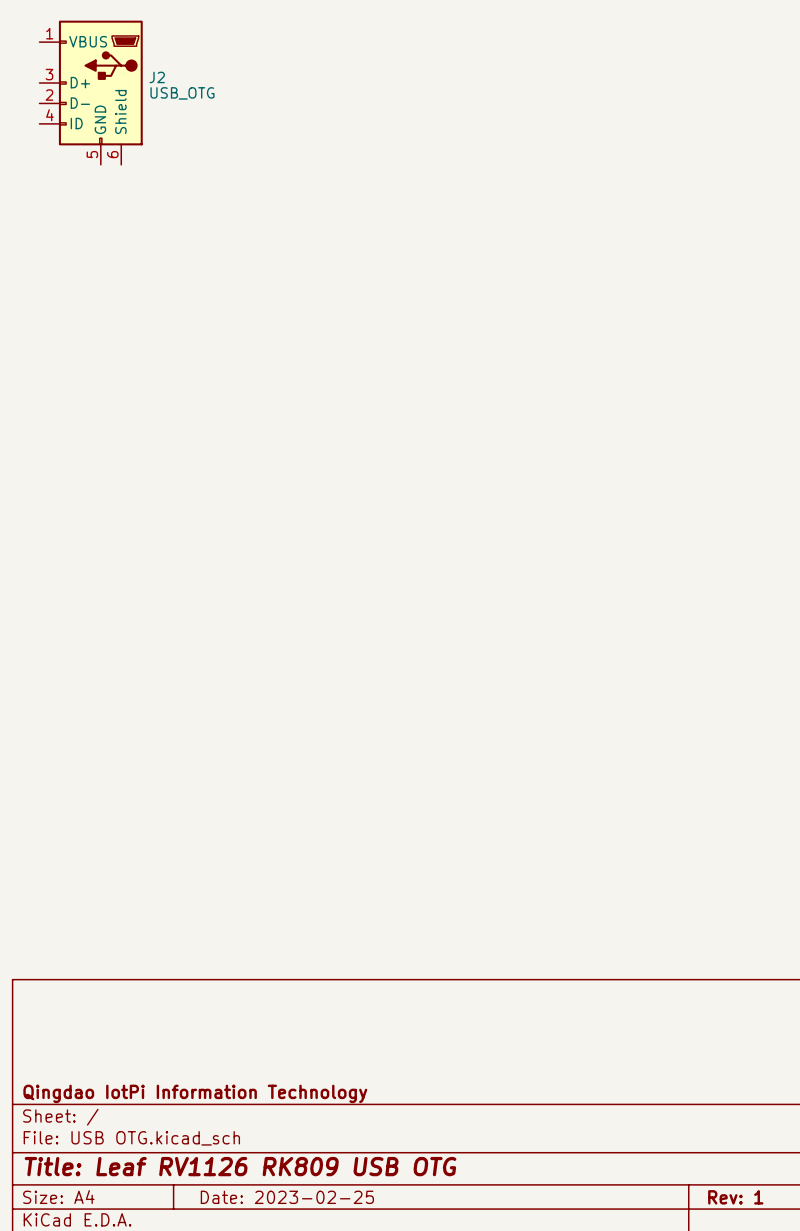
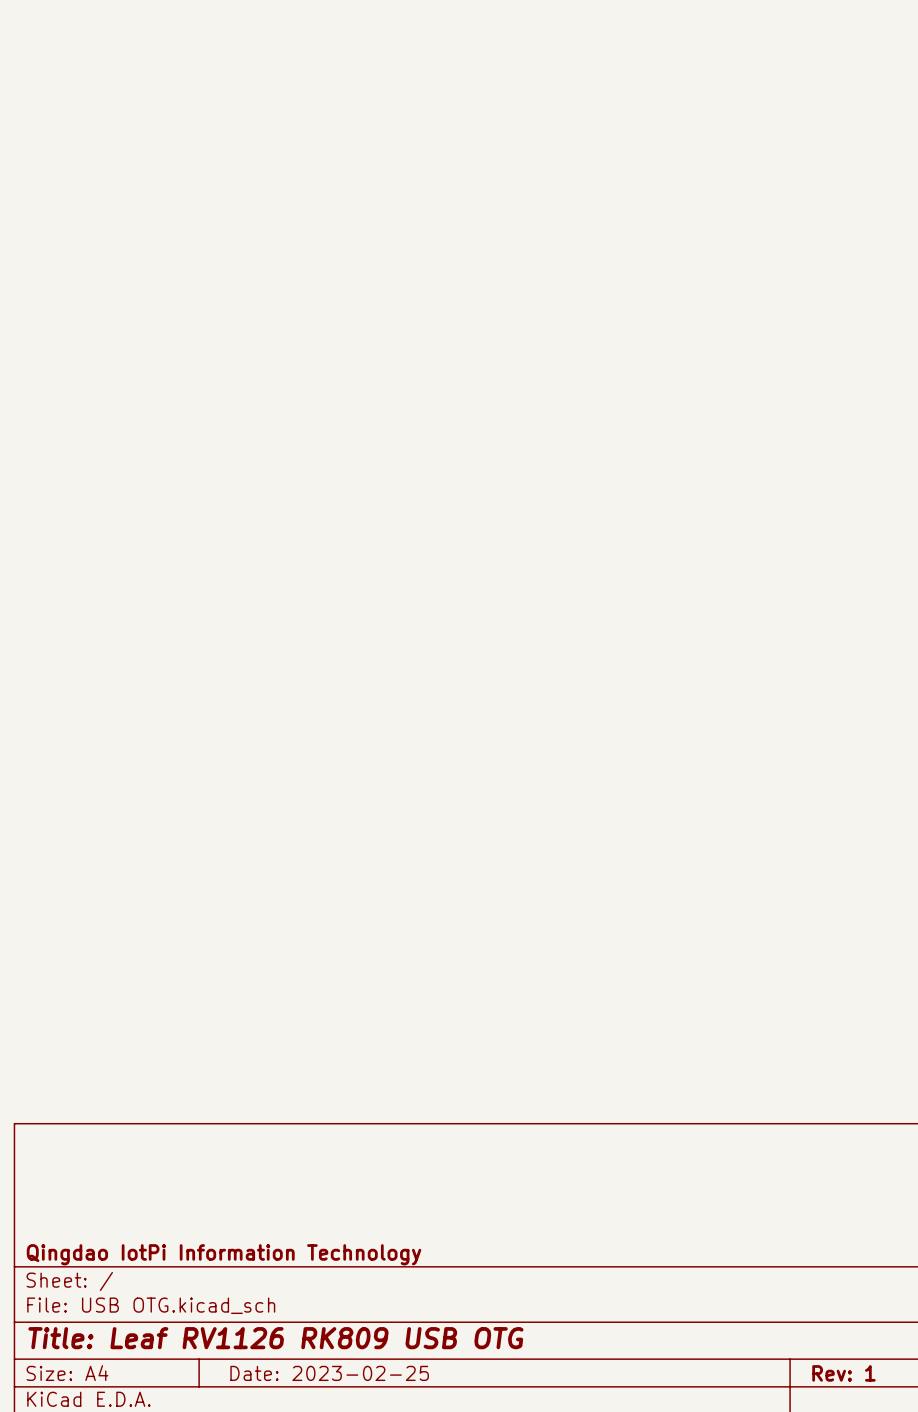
J2: USB_OTG (91, 92) -> none

